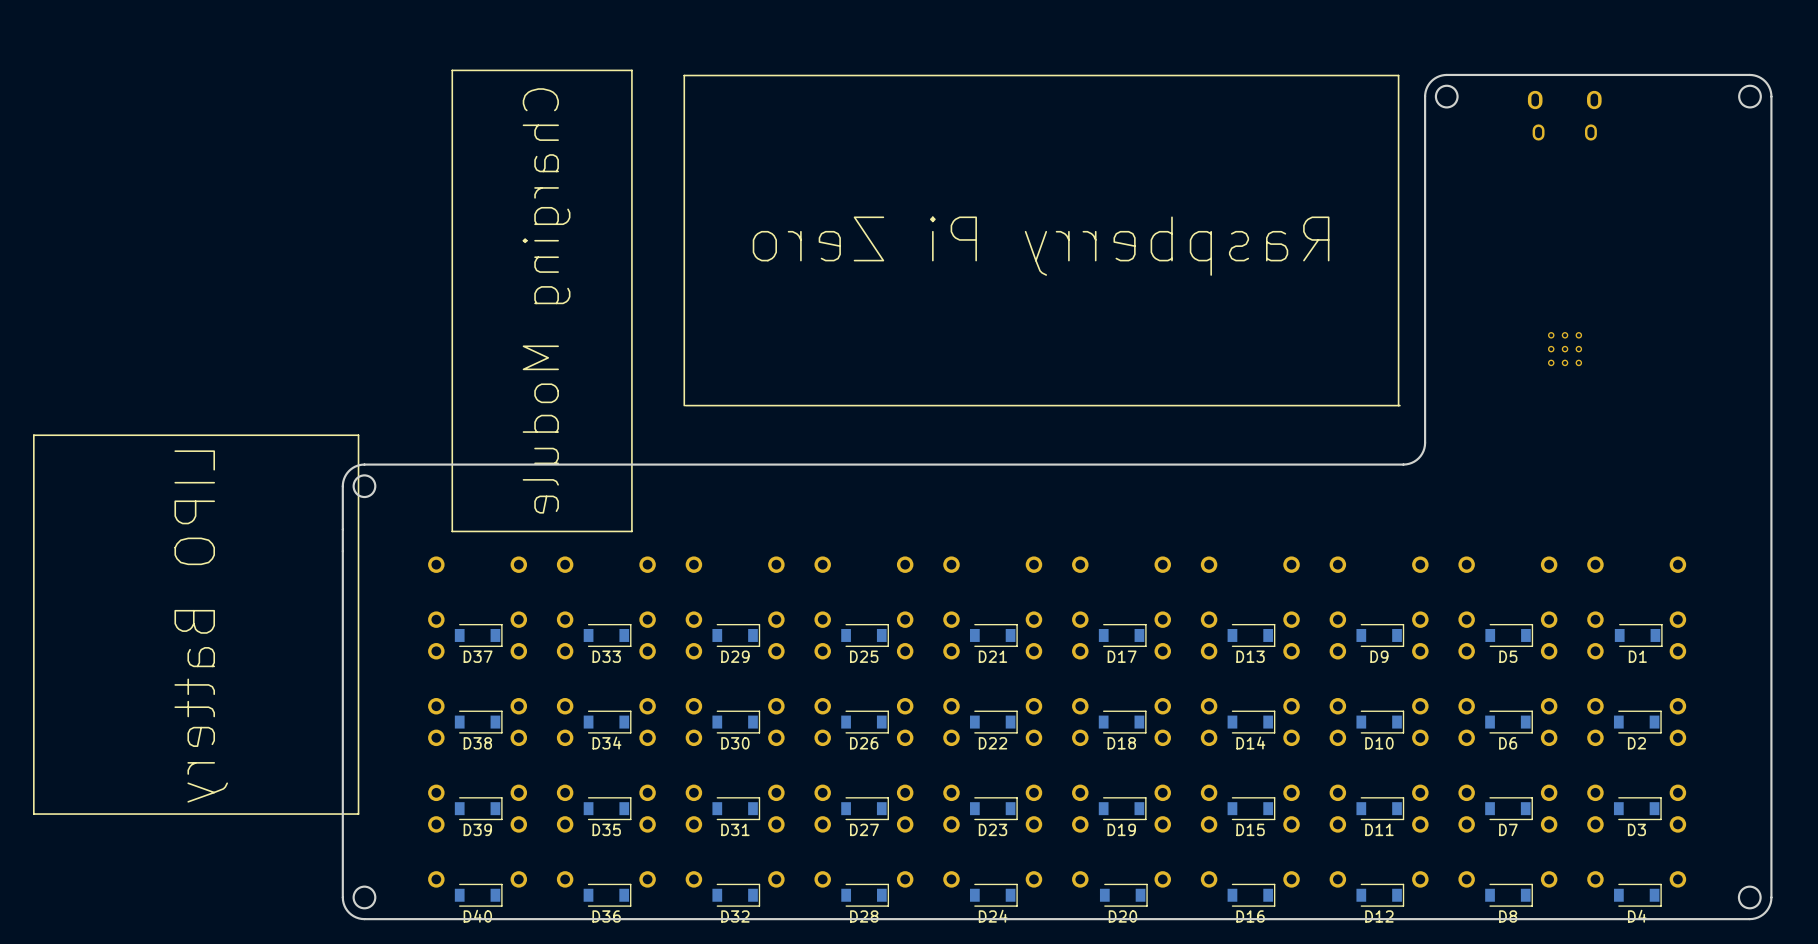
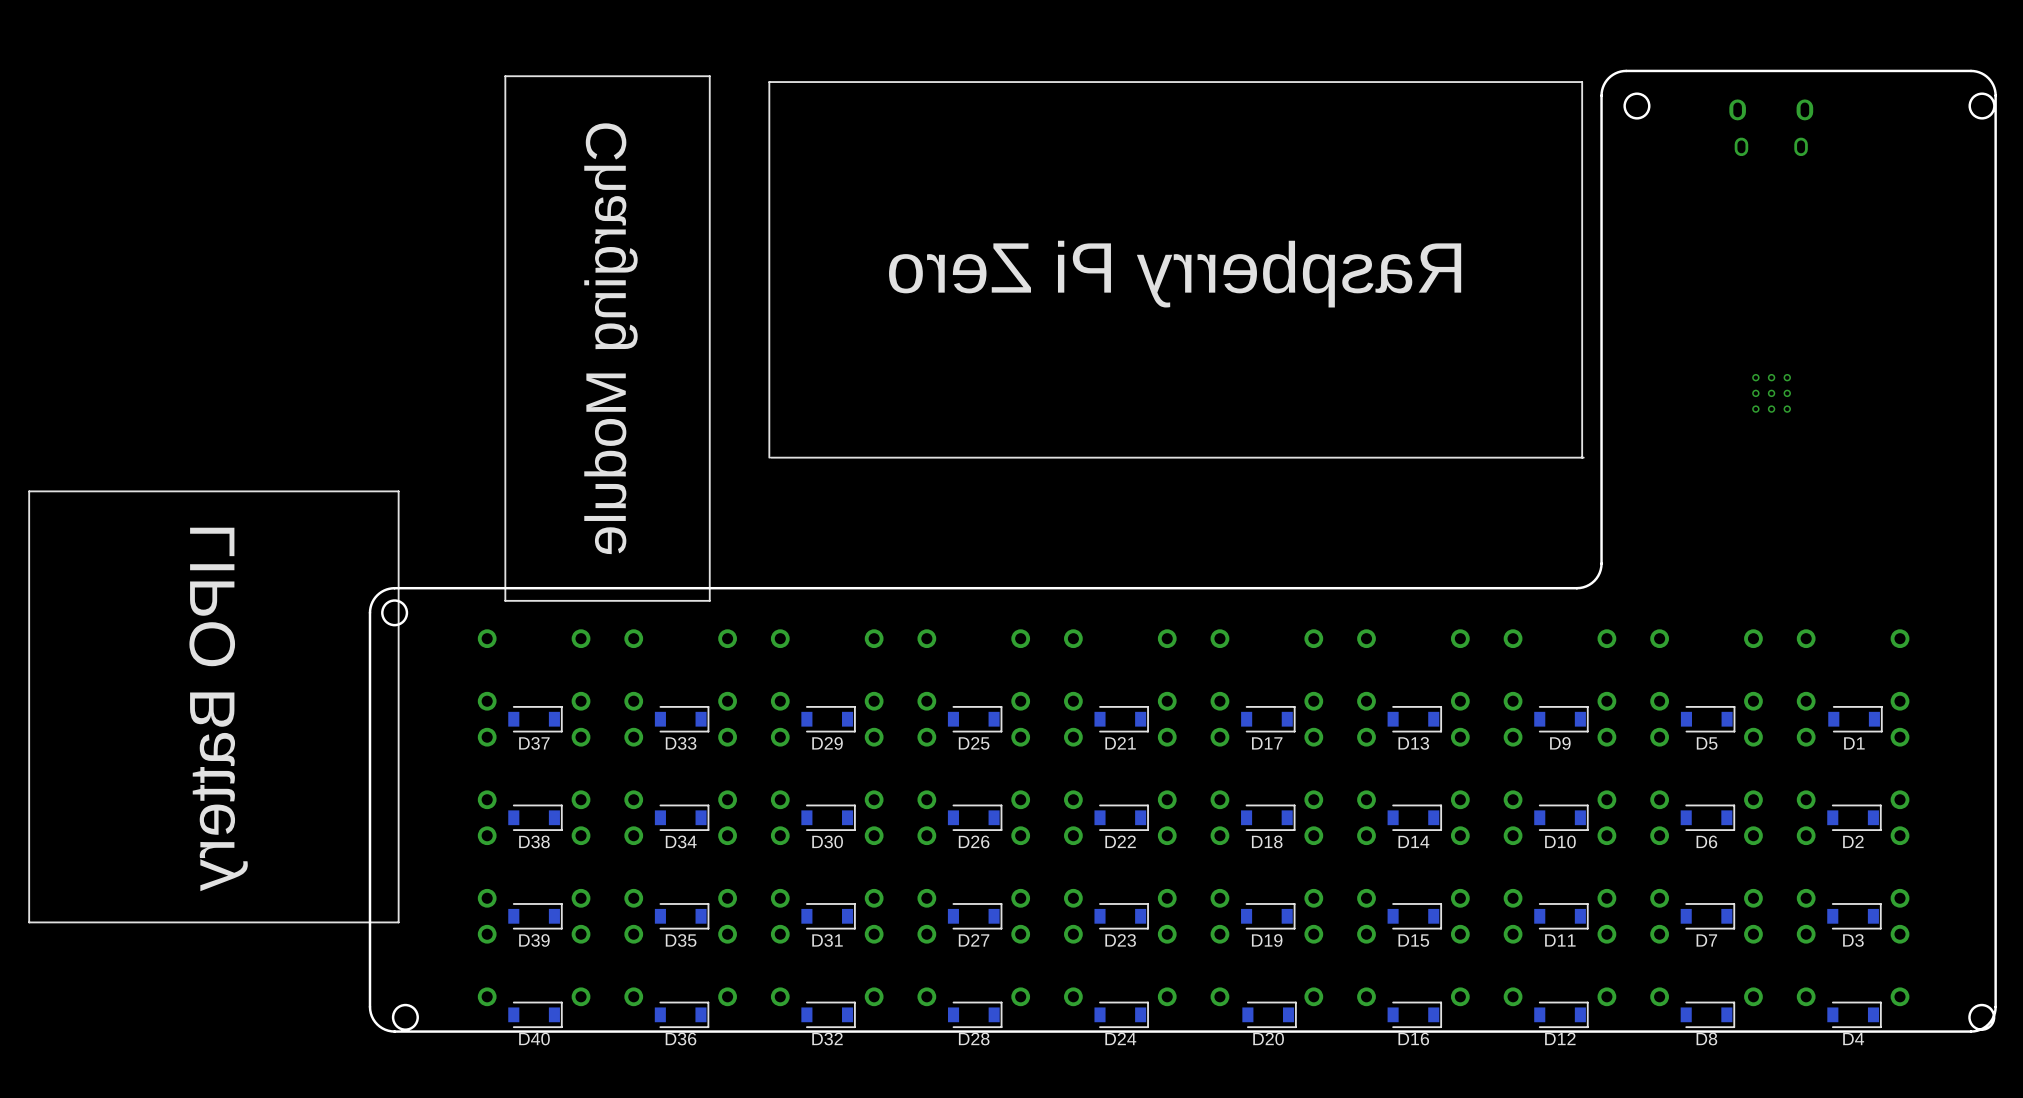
board edge: (1749, 74) (1446, 74) (1437, 77) (1429, 83) (1425, 96) (1425, 442) (1420, 456) (1409, 463) (364, 464) (352, 467) (344, 476) (342, 486) (342, 897) (345, 908) (353, 916) (364, 919) (1749, 919) (1760, 916) (1768, 908) (1771, 897) (1771, 96) (1769, 87) (1765, 81) (1756, 76) (1749, 74) -> (1971, 70) (1979, 72) (1988, 78) (1993, 84) (1995, 95) (1995, 1006) (1992, 1019) (1983, 1028) (1971, 1031) (394, 1031) (382, 1028) (373, 1019) (369, 1006) (369, 612) (372, 602) (381, 591) (394, 588) (1583, 587) (1596, 578) (1601, 563) (1601, 95) (1606, 80) (1615, 73) (1626, 70) (1971, 70)
round board edge position: (364, 486) -> (394, 612)

